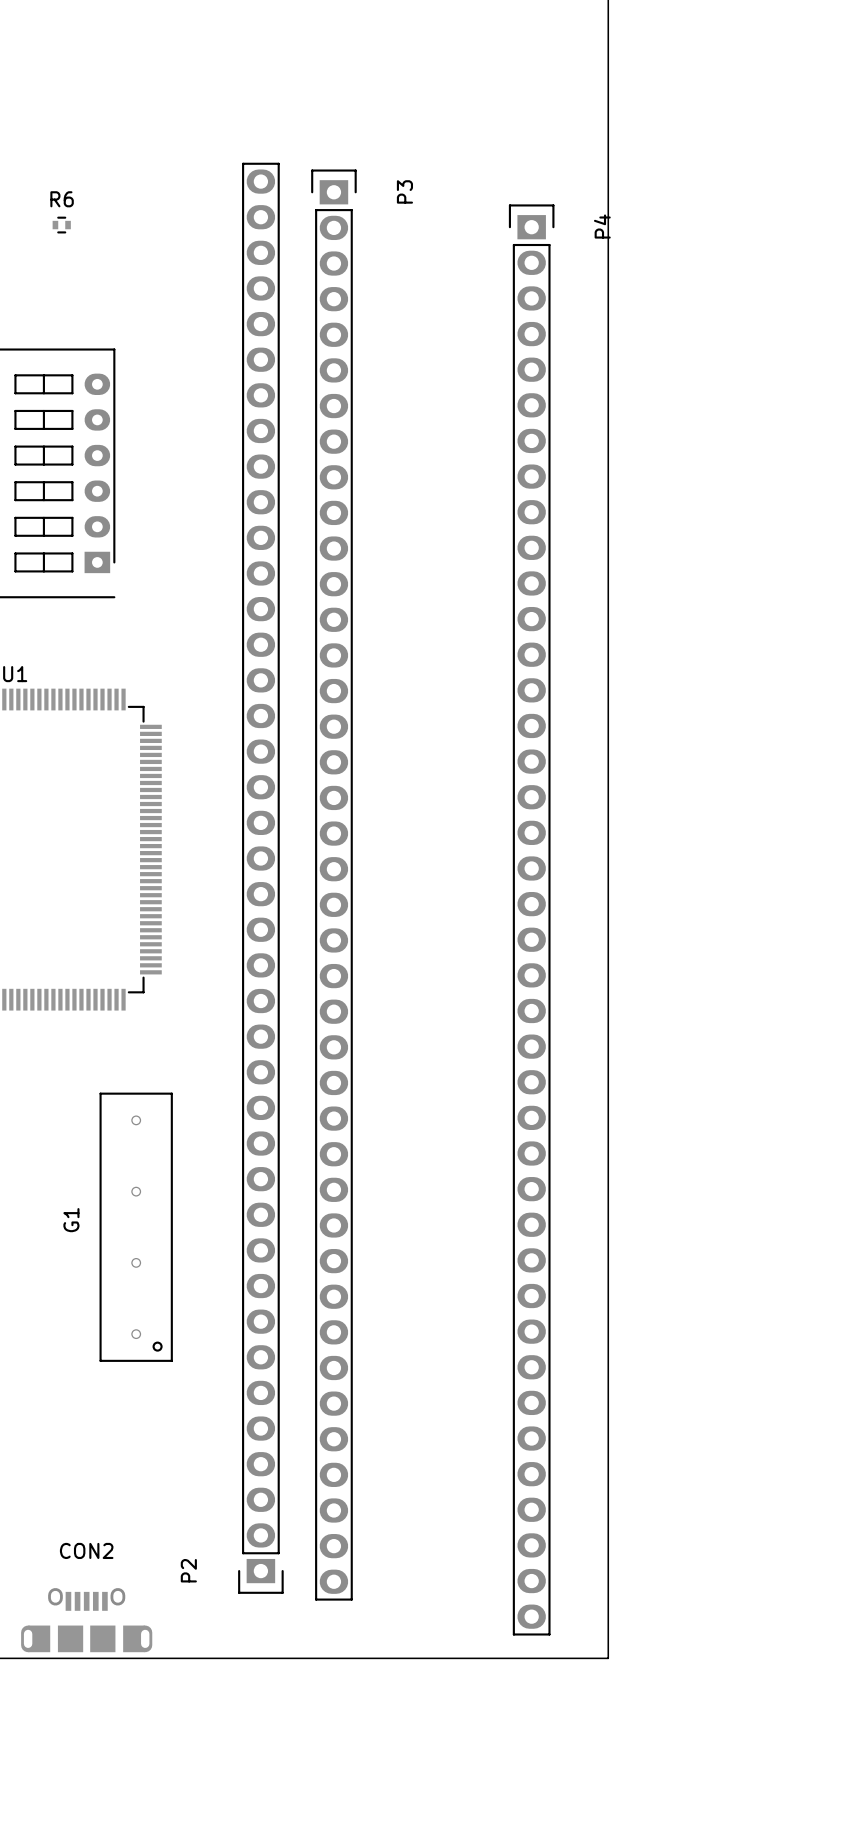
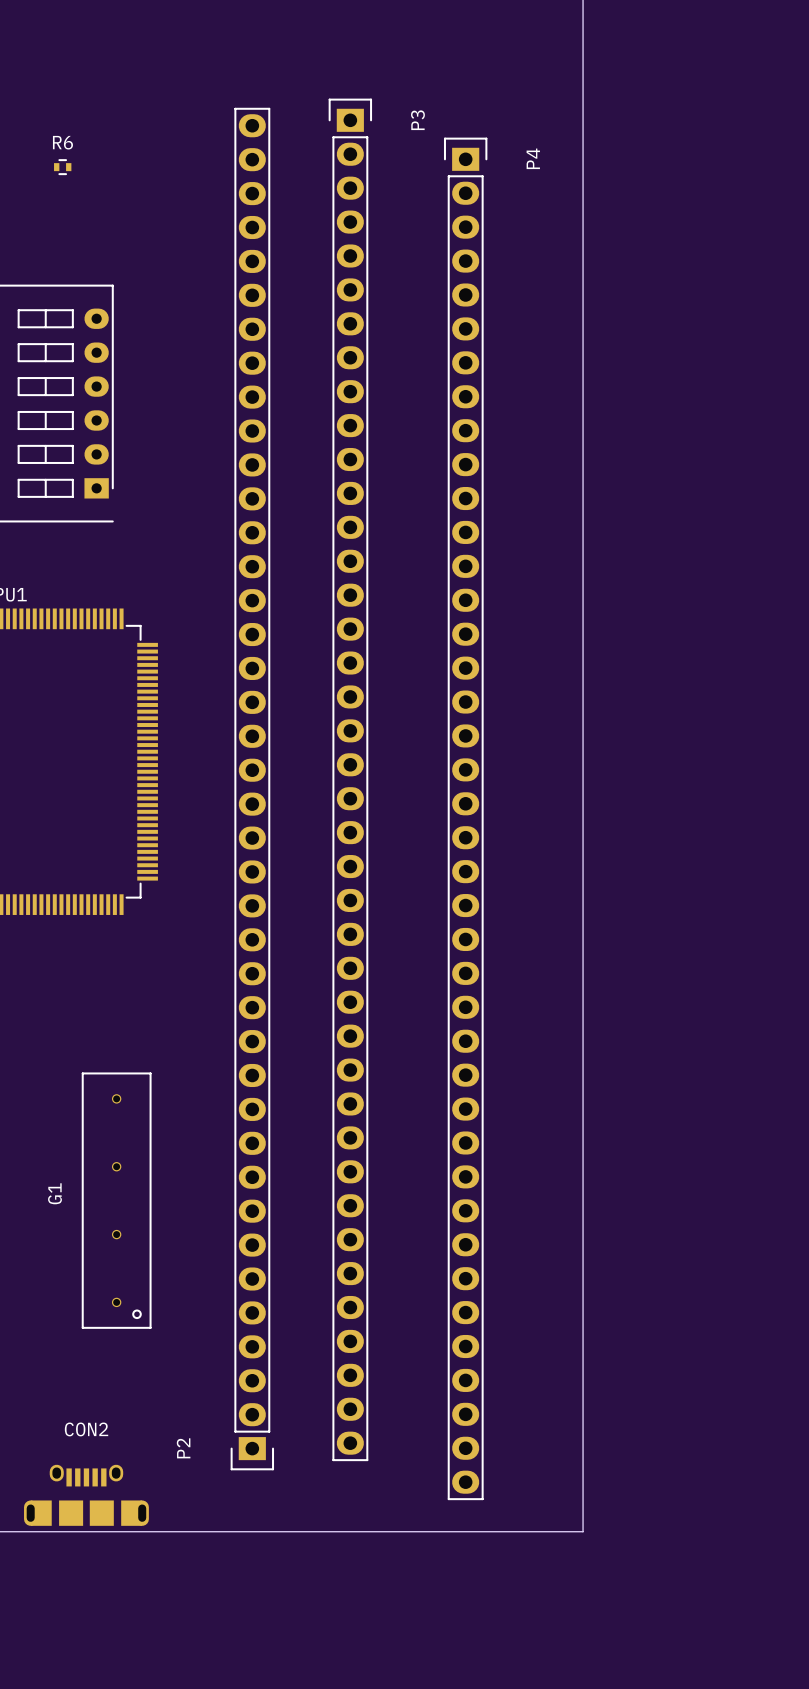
P3 position: (333, 885) -> (350, 779)
P4 position: (531, 919) -> (465, 818)
G1 position: (136, 1227) -> (116, 1200)

